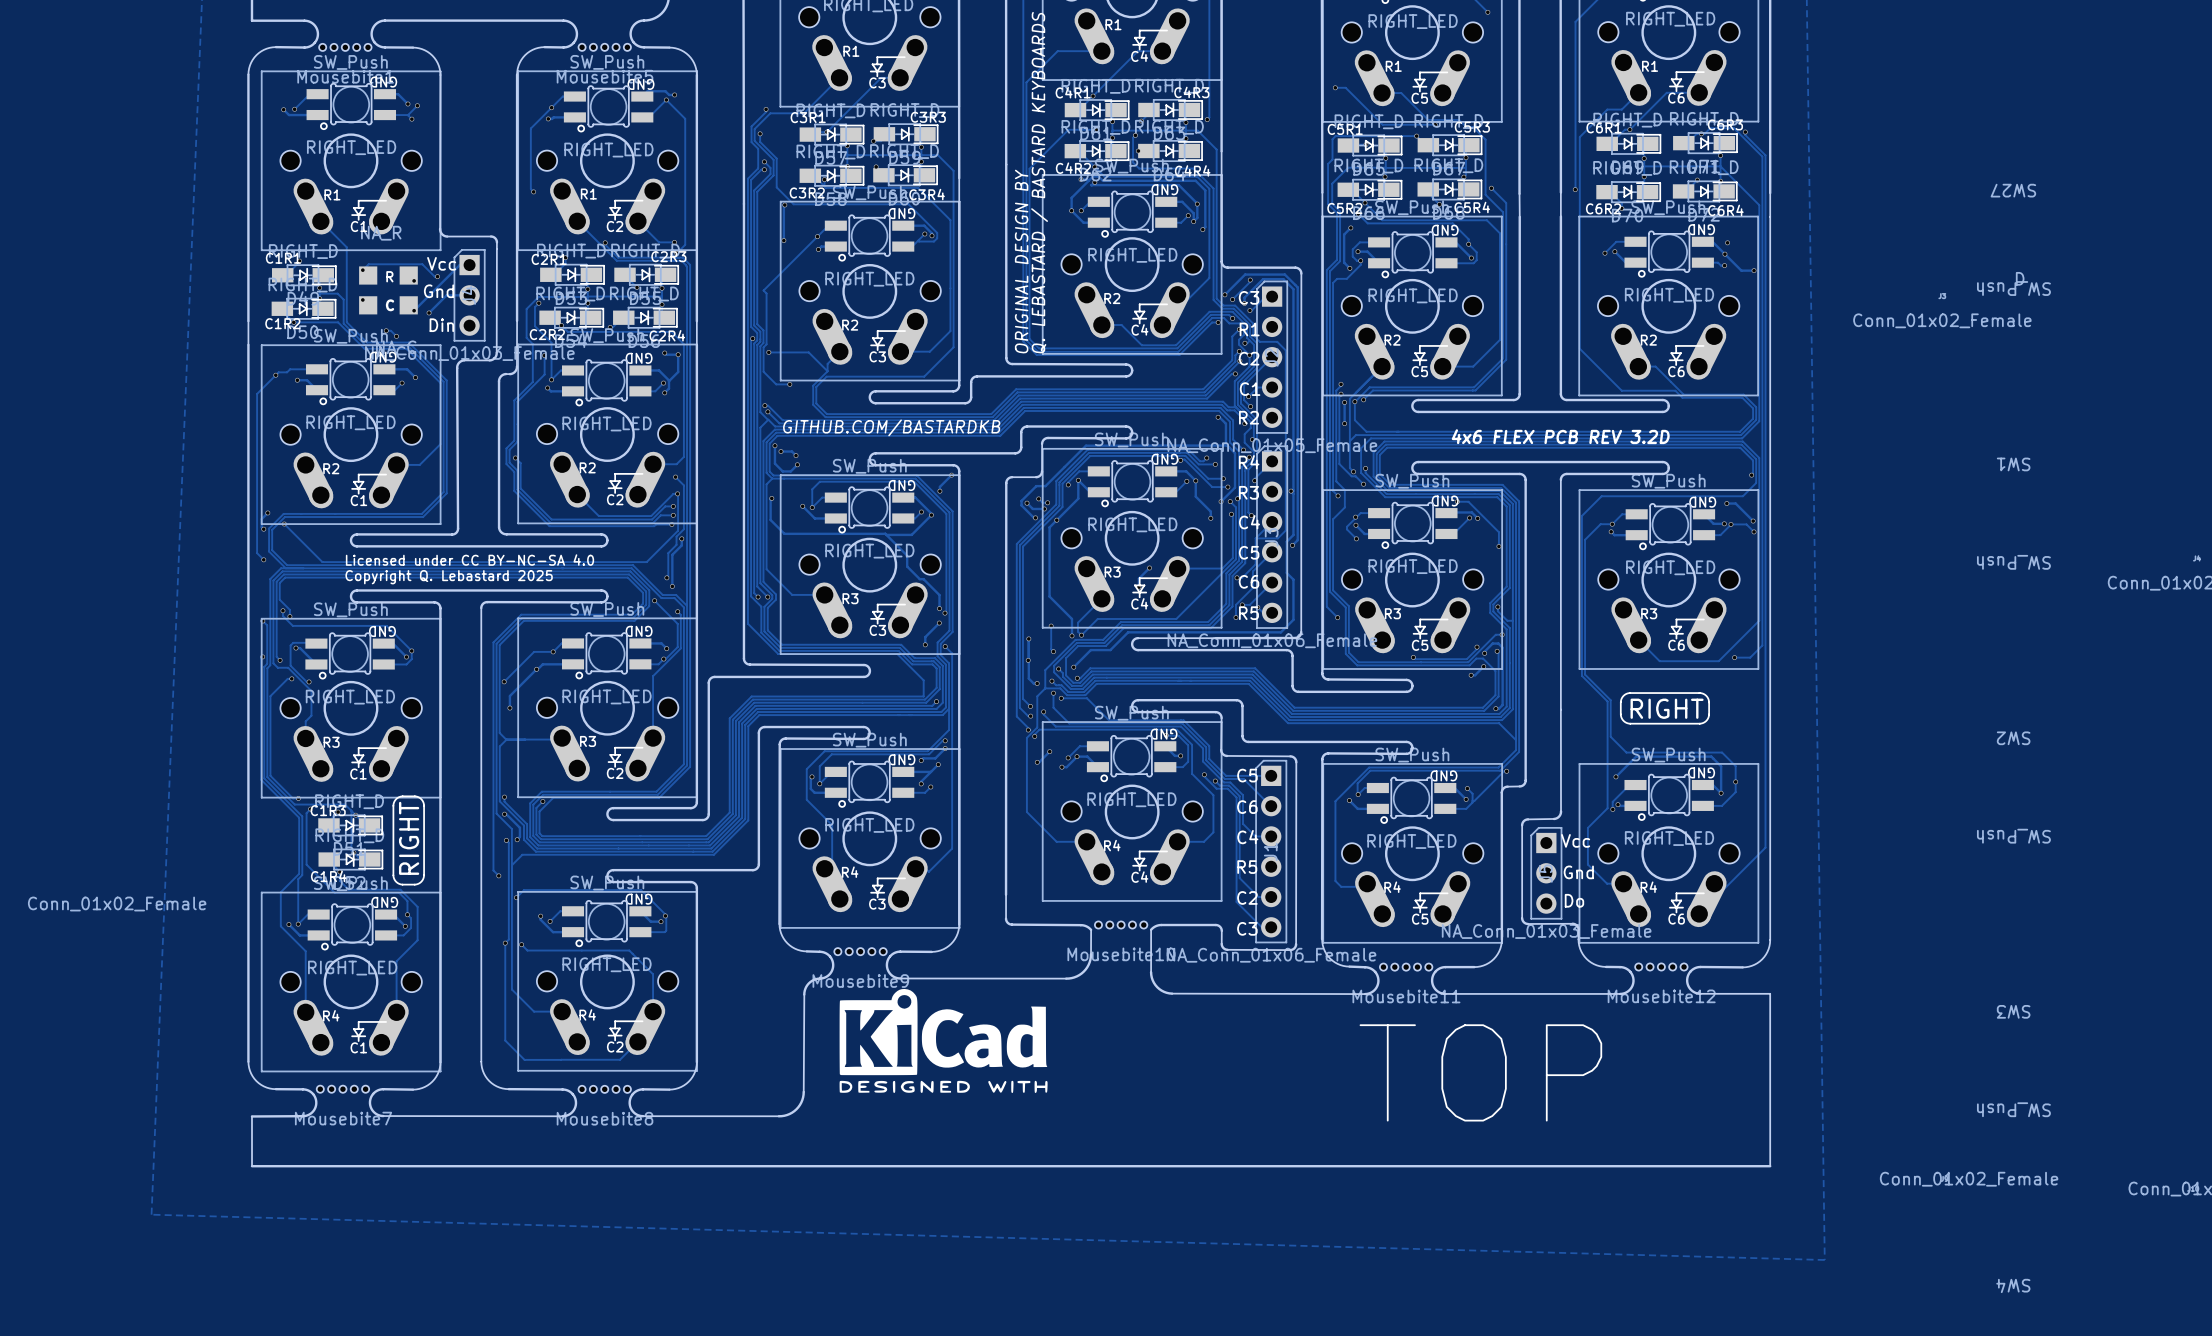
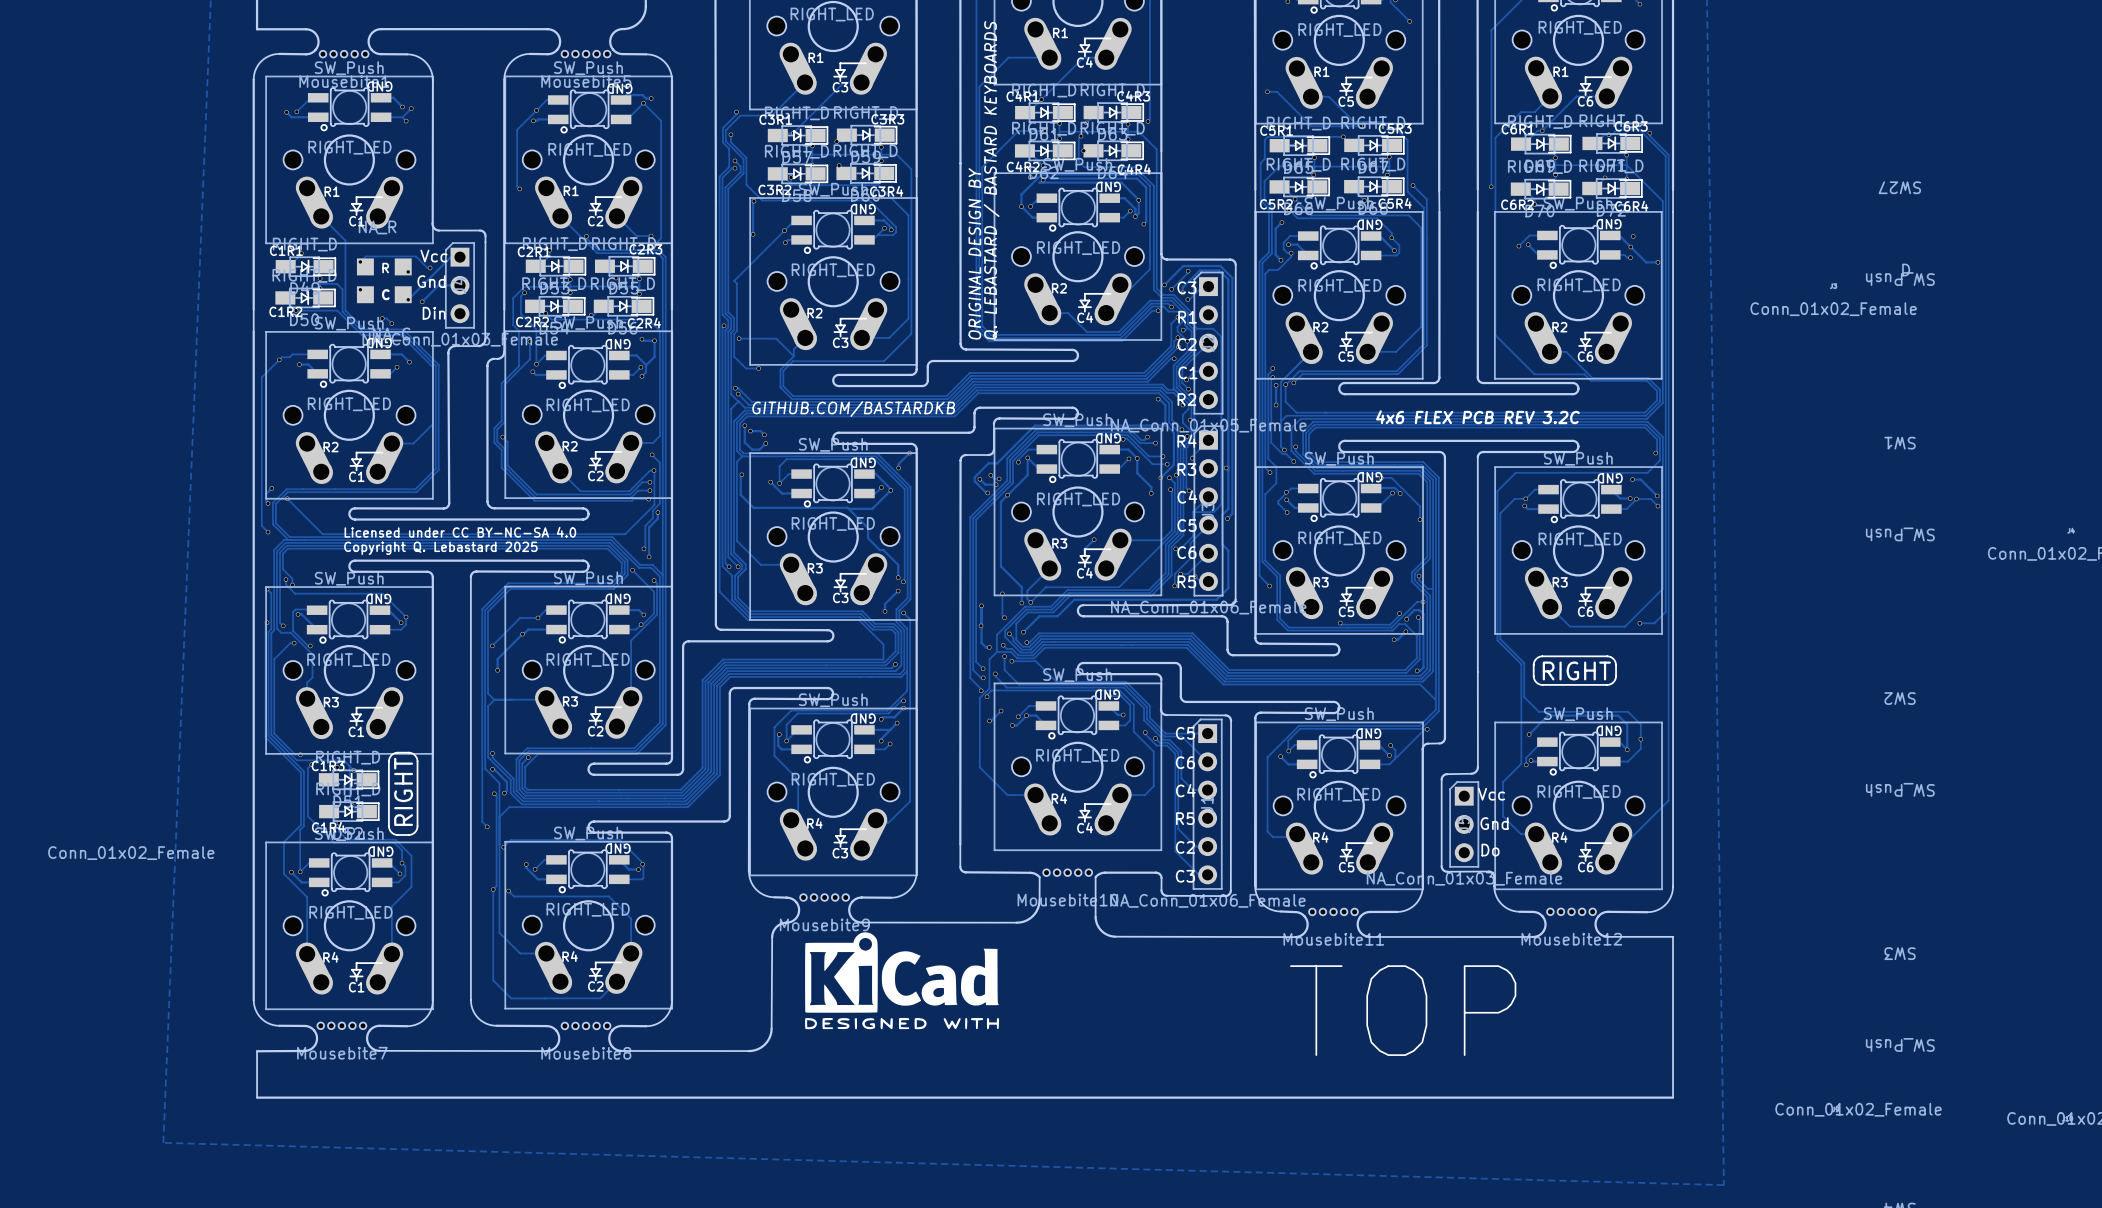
text: 4x6 FLEX PCB REV 3.2D (1560, 436) -> 4x6 FLEX PCB REV 3.2C (1477, 417)

